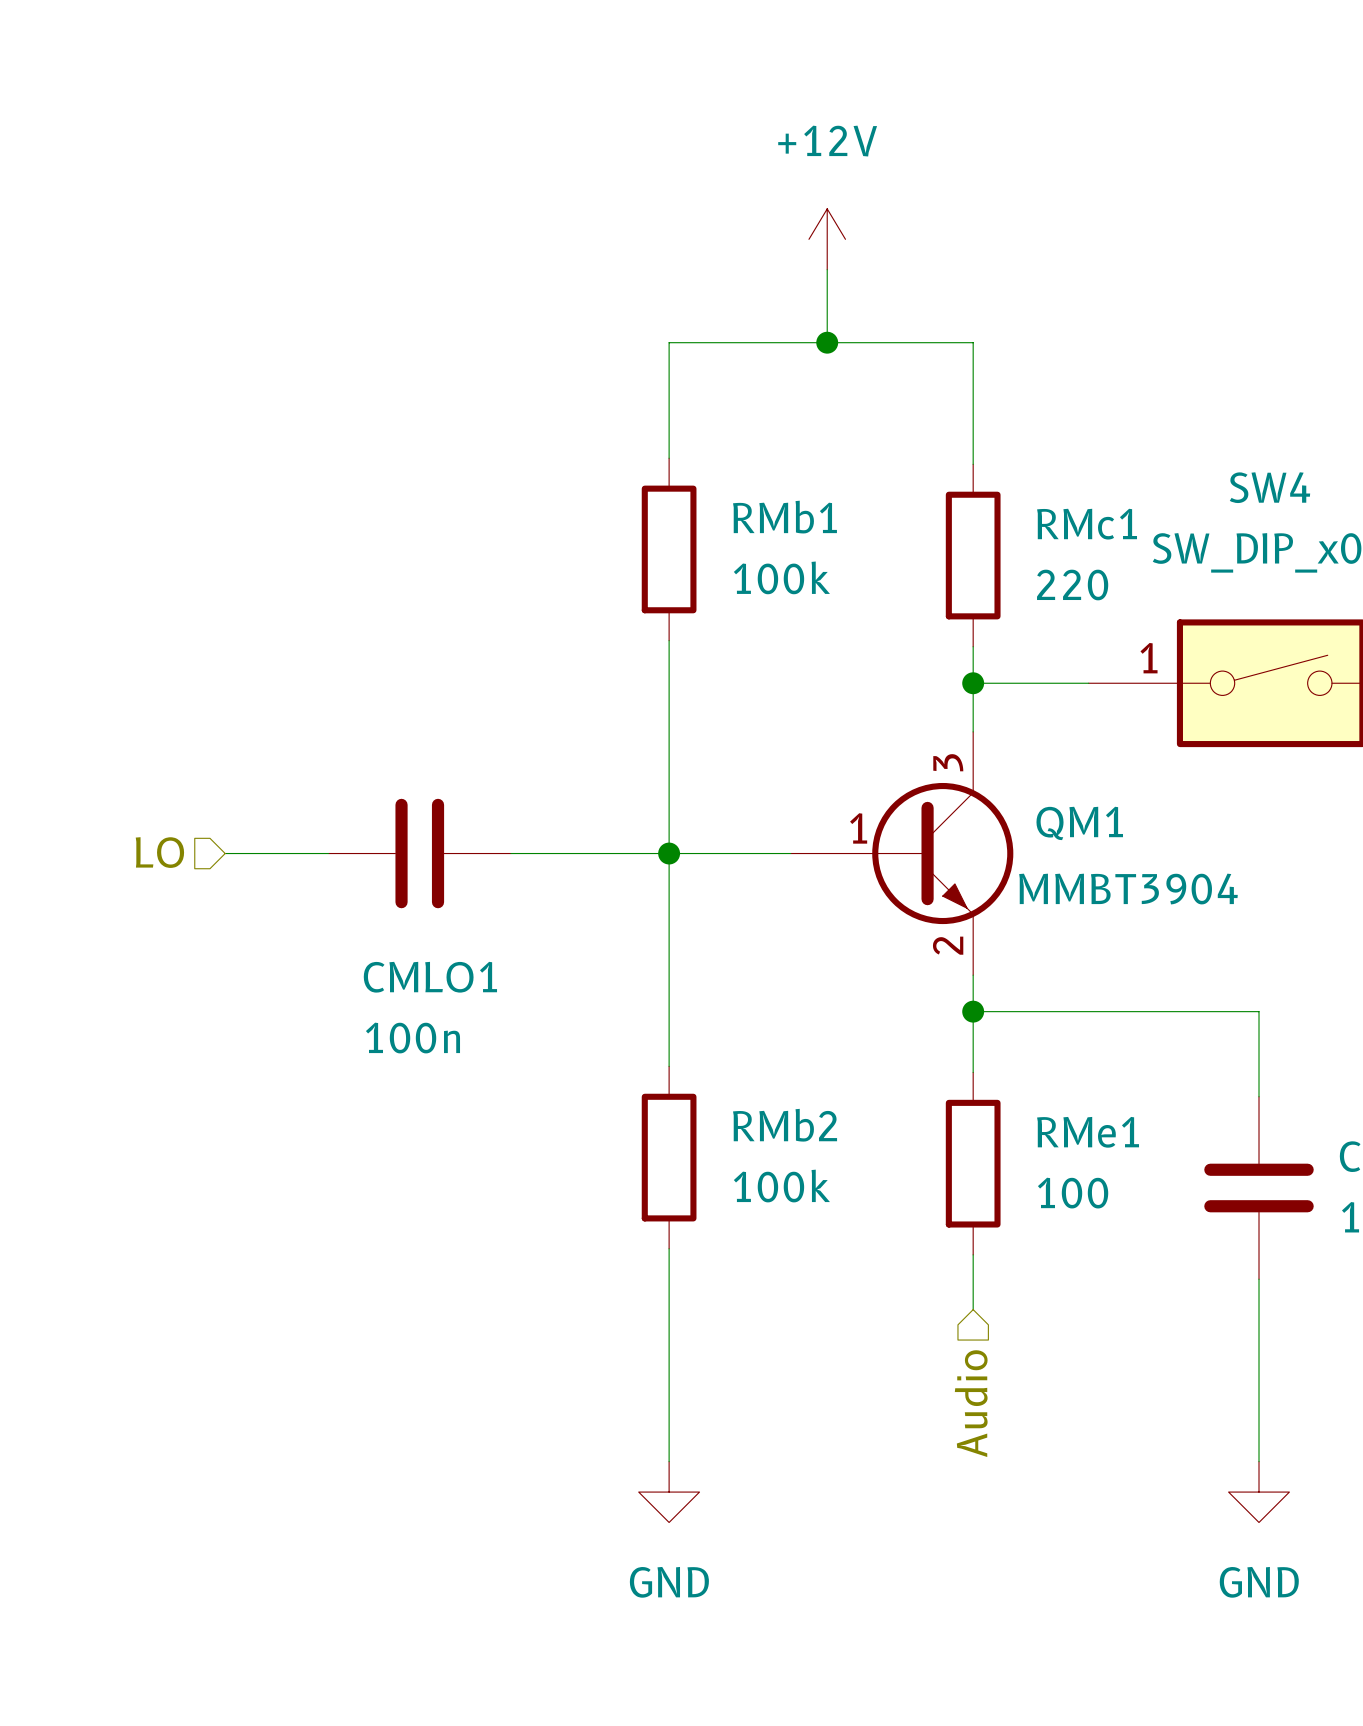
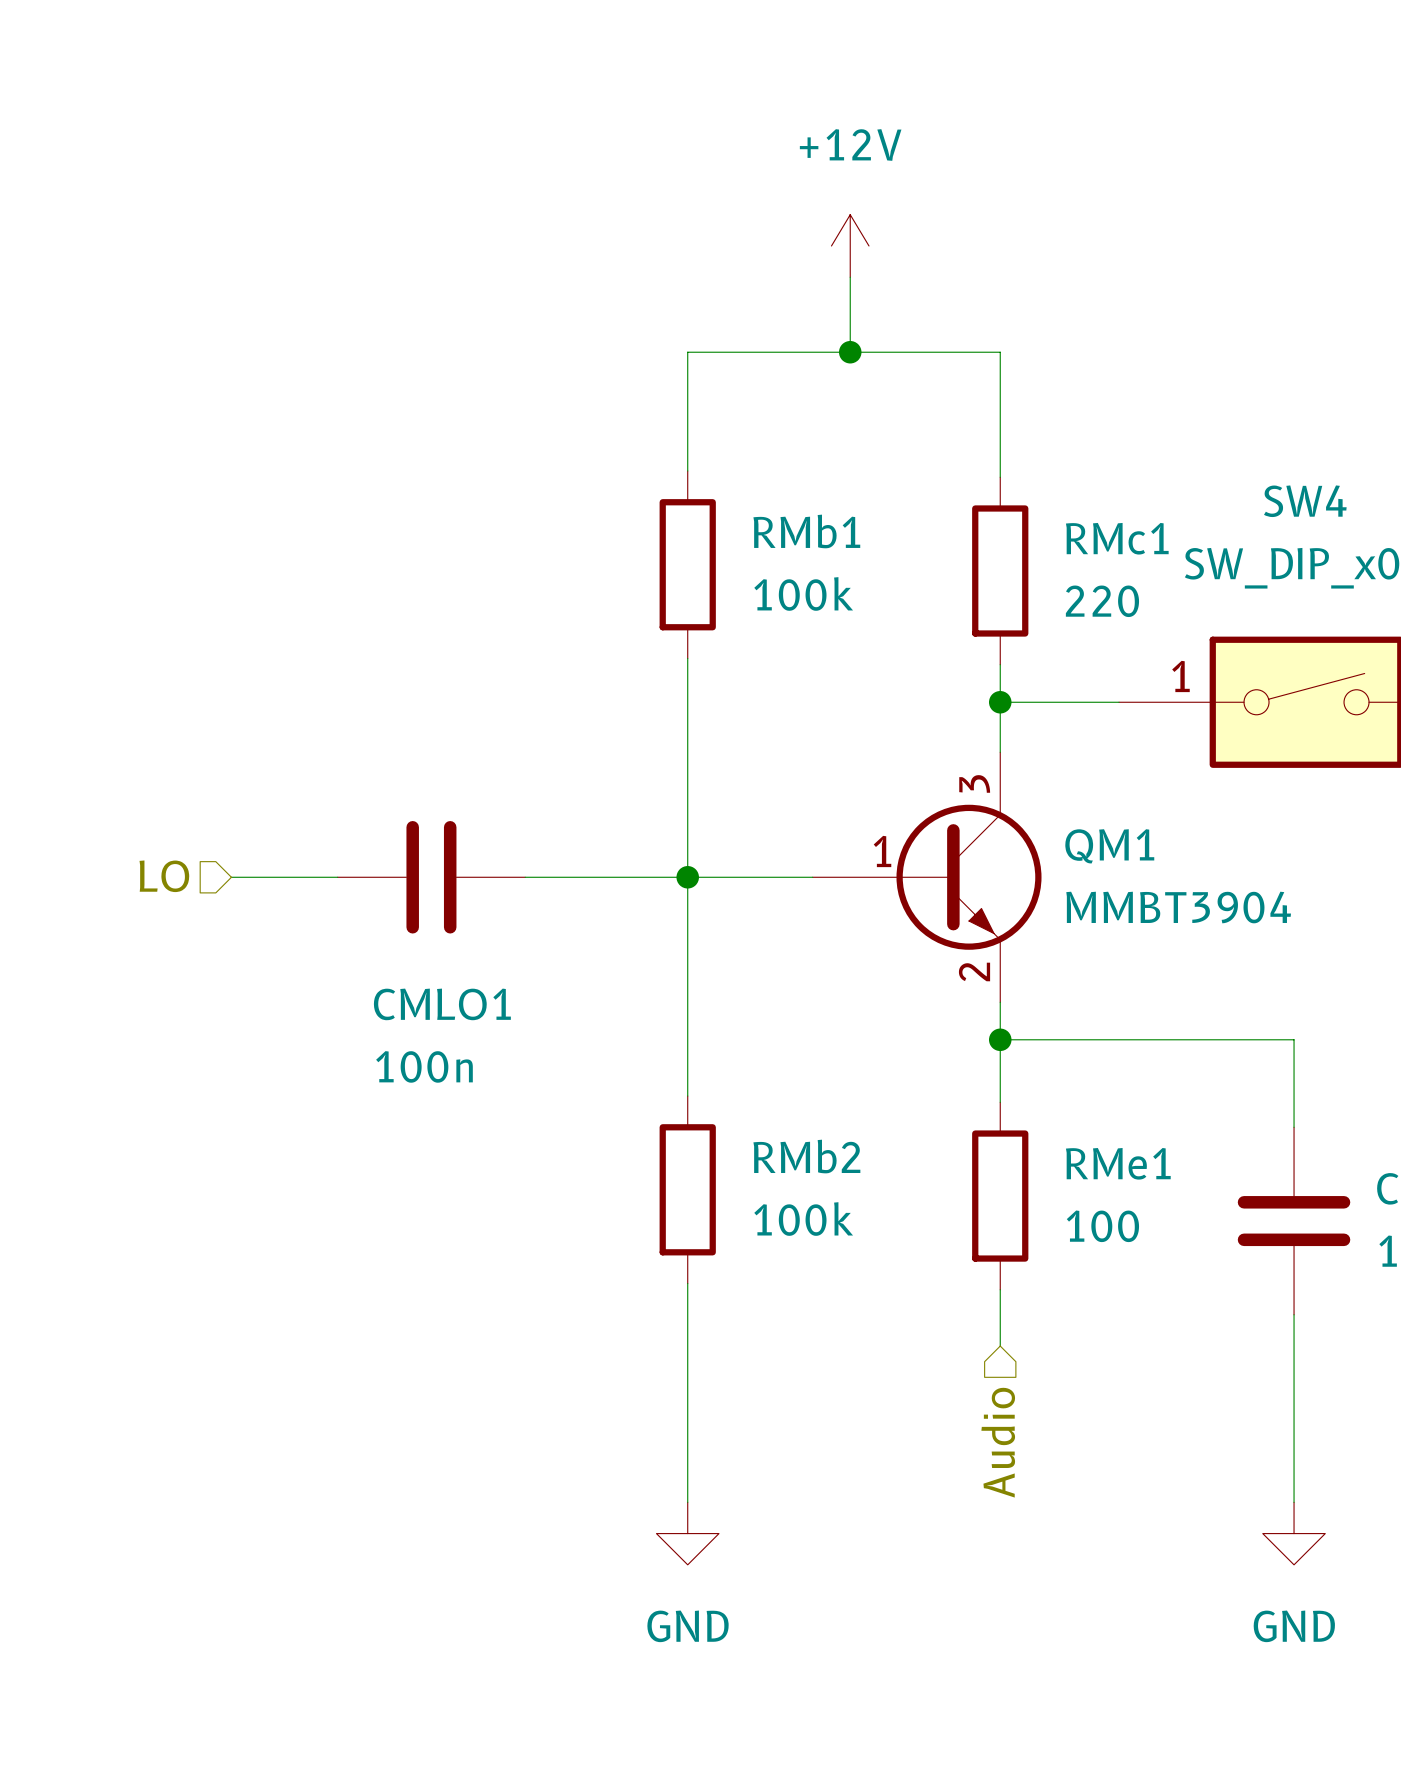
QM1 value position: MMBT3904 (1128, 889) -> MMBT3904 (1178, 907)

